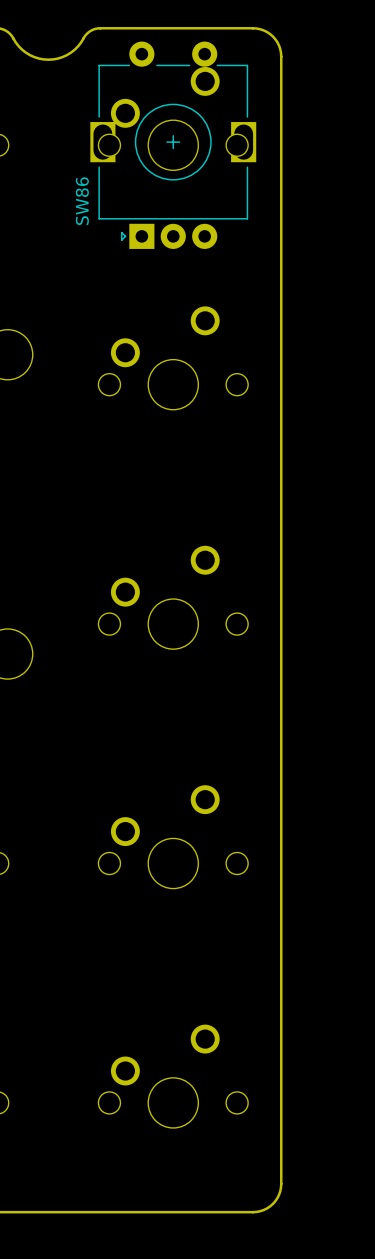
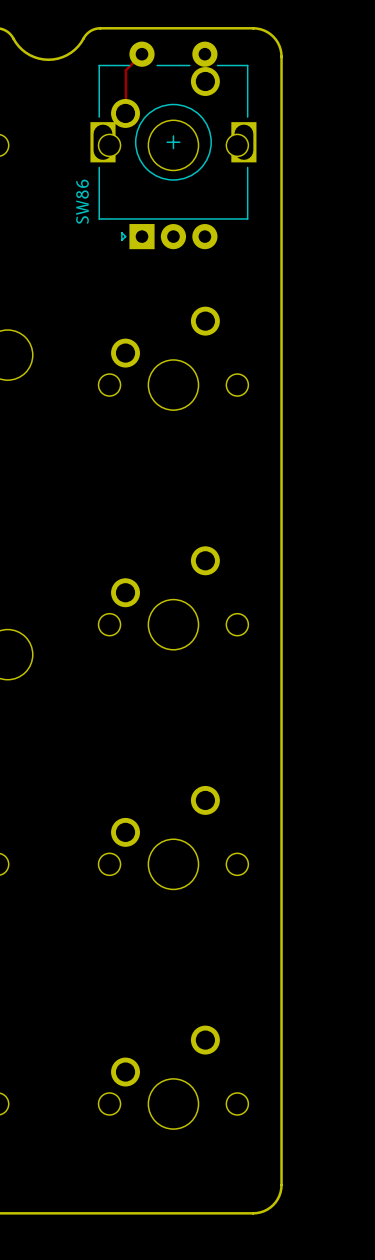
track: none -> (143, 55) (142, 54) (125, 70) (125, 113)

